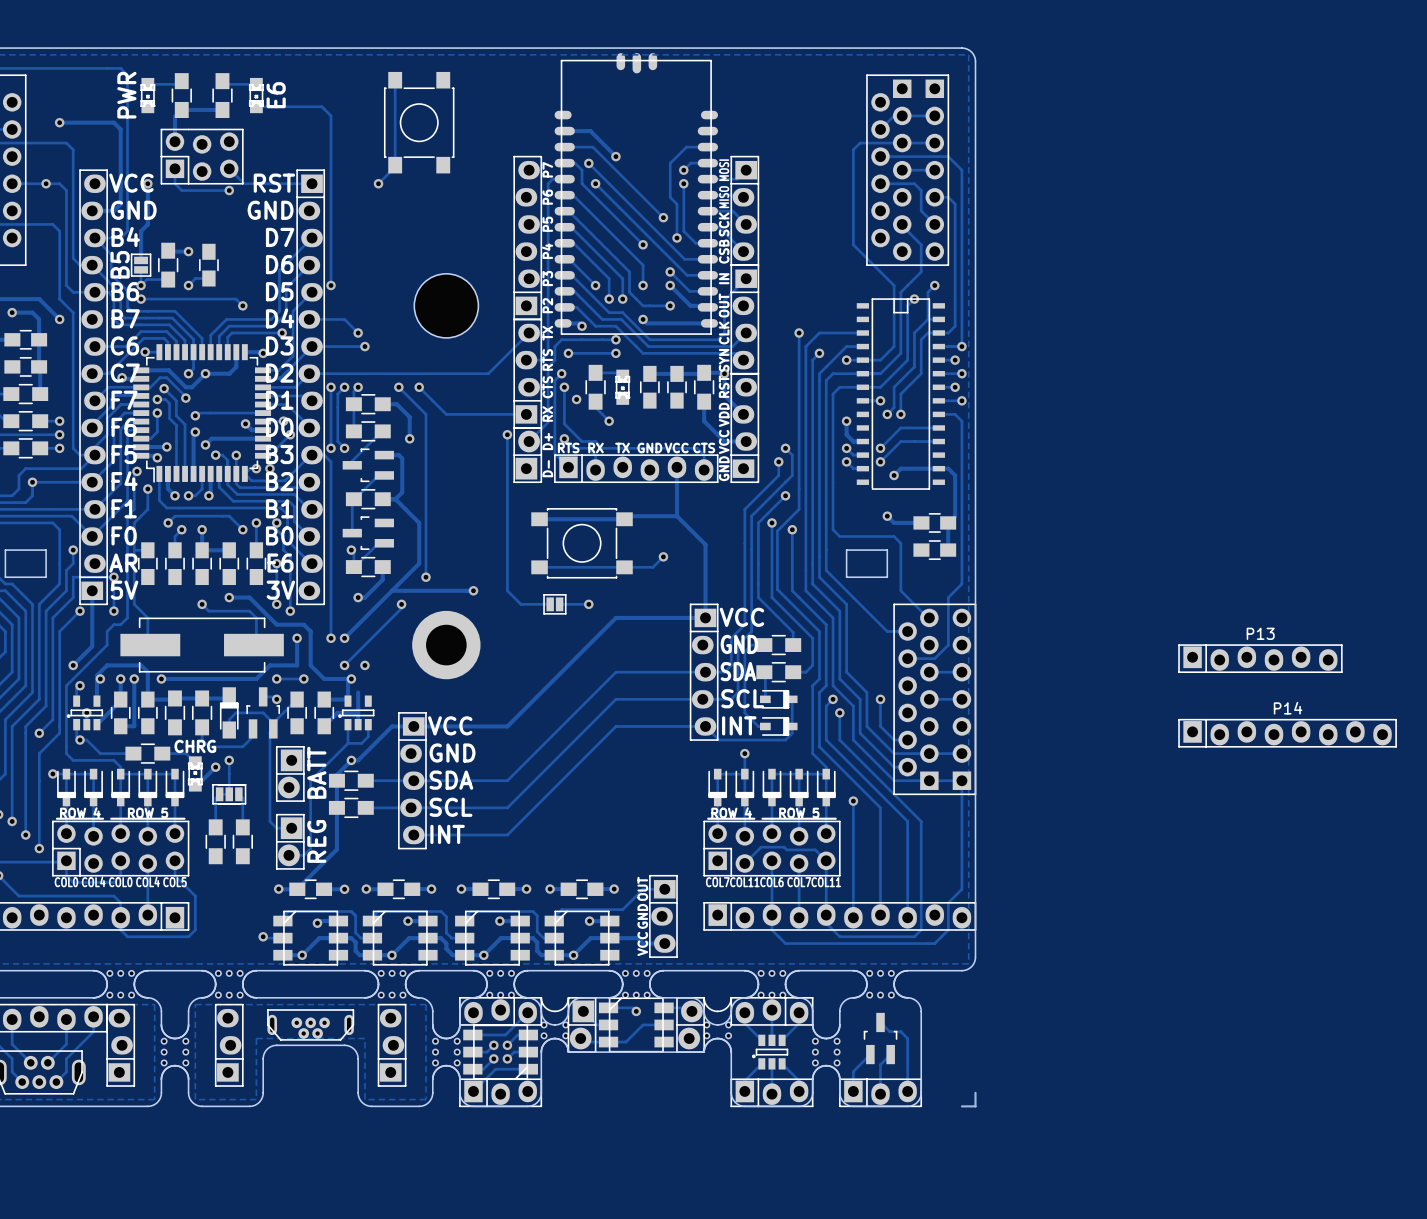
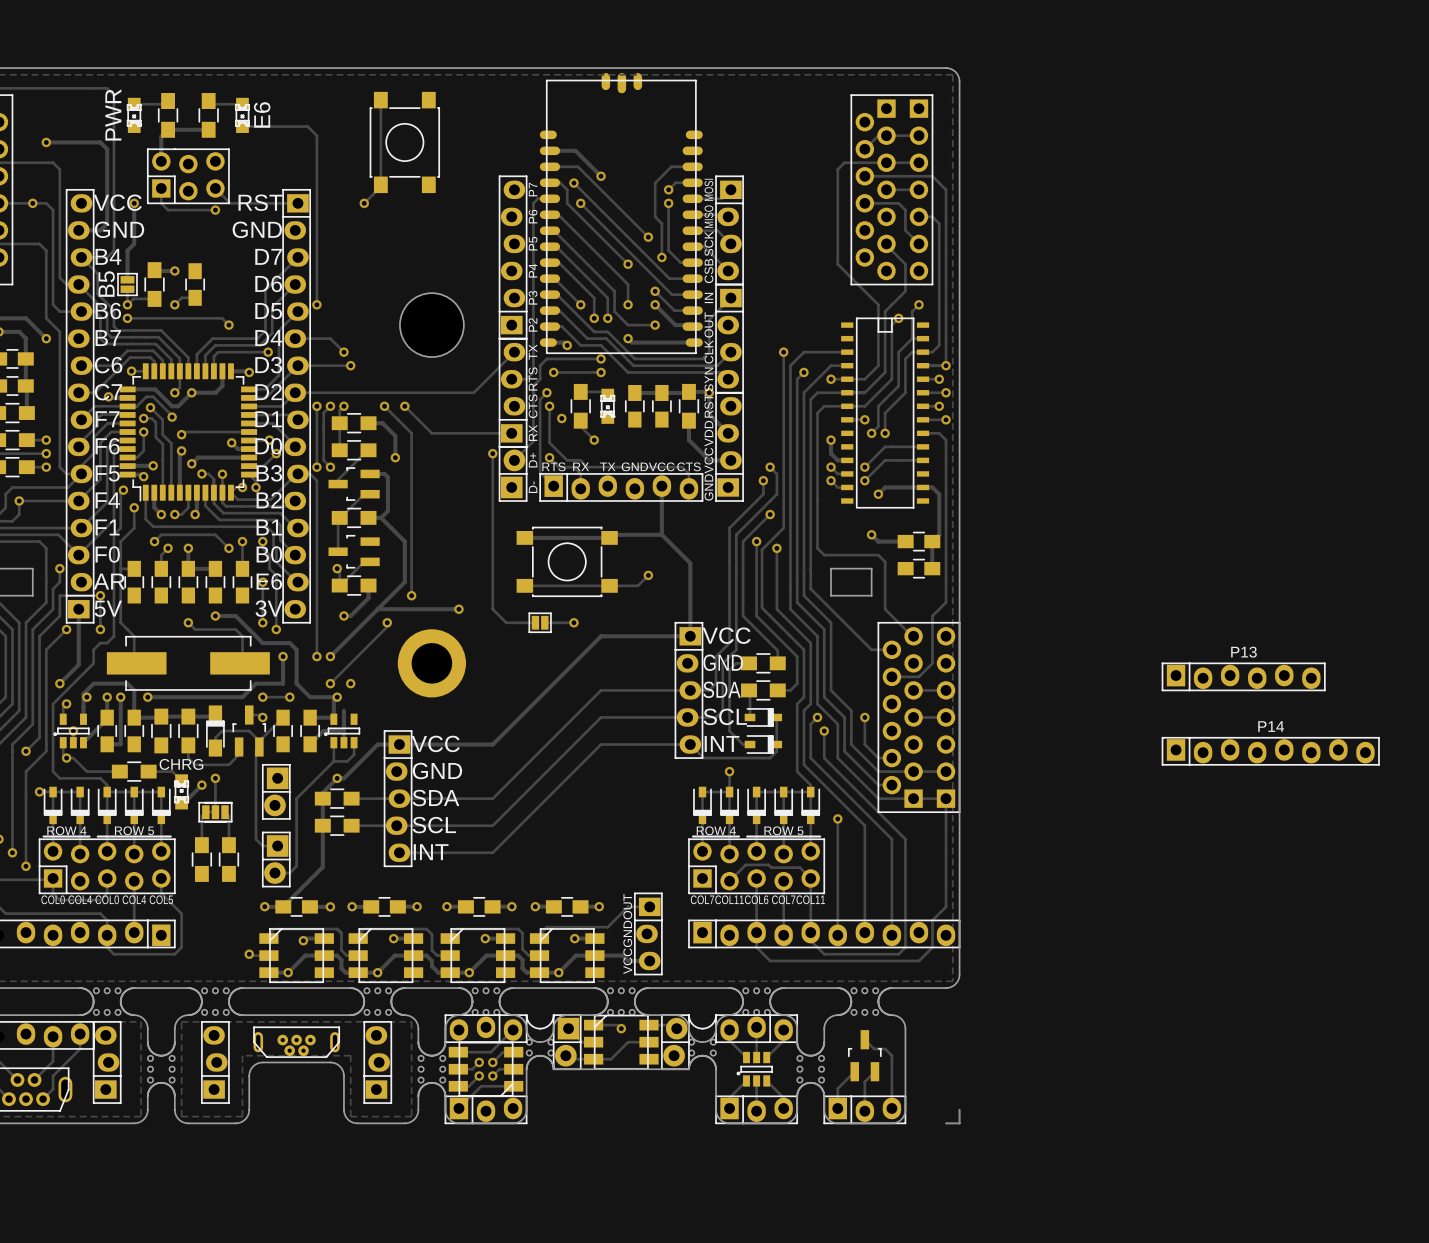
text: BATT (316, 772) -> none
text: REG (316, 841) -> none

